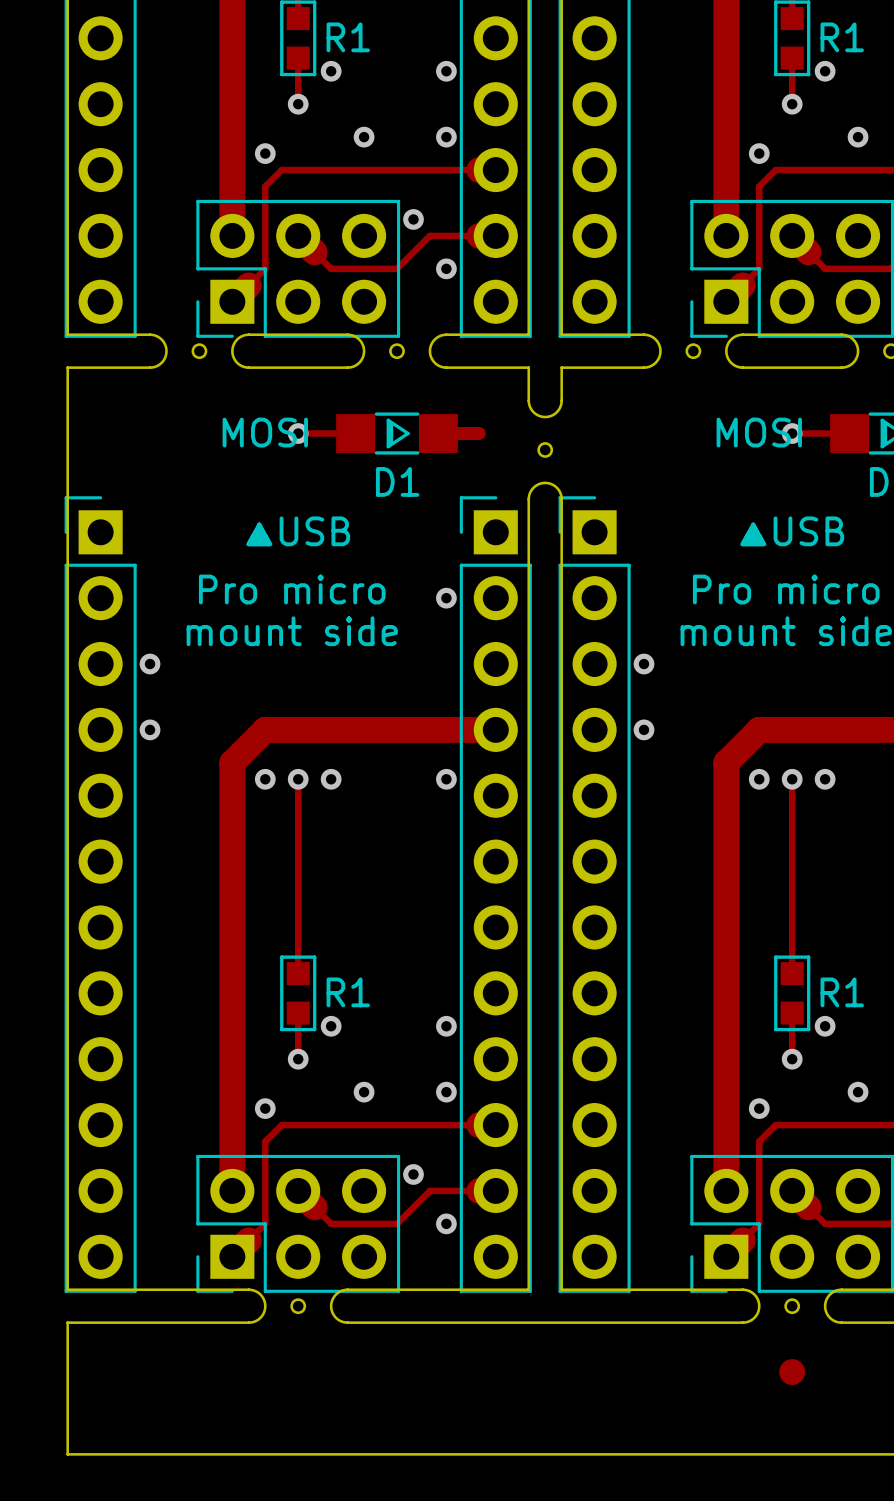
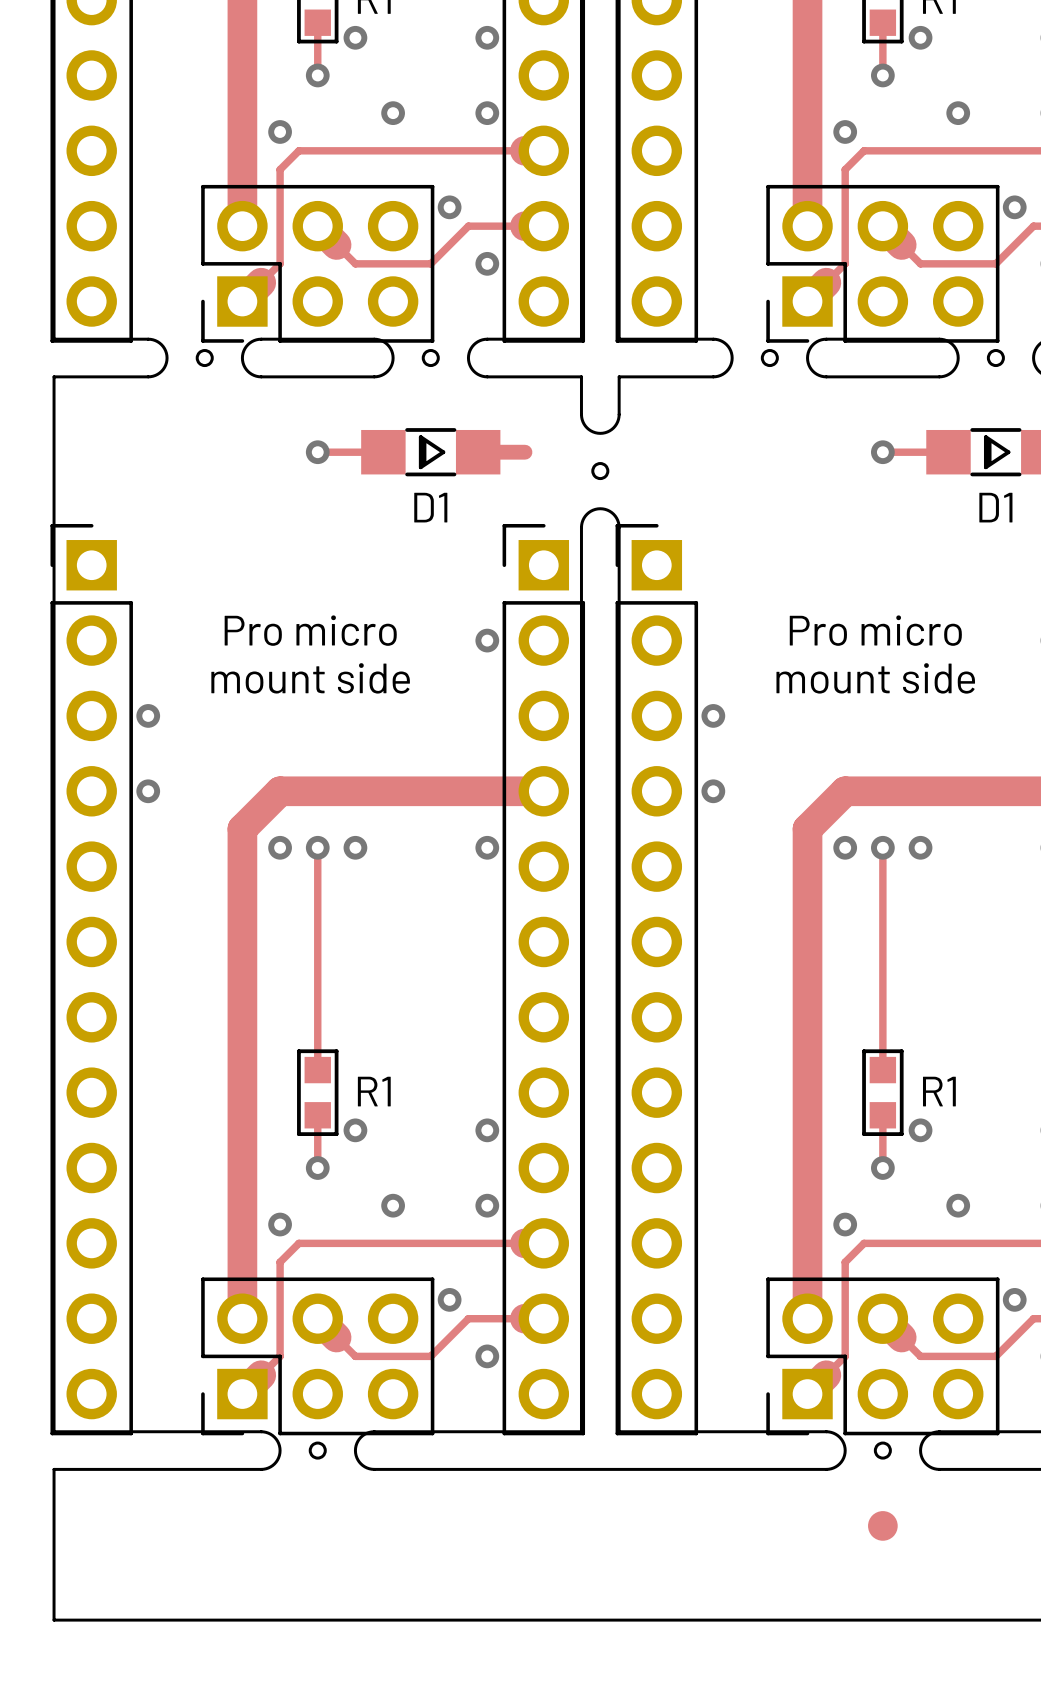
text: MOSI (265, 432) -> none
text: MOSI (759, 432) -> none
text: ▲USB (298, 531) -> none
text: ▲USB (792, 531) -> none

